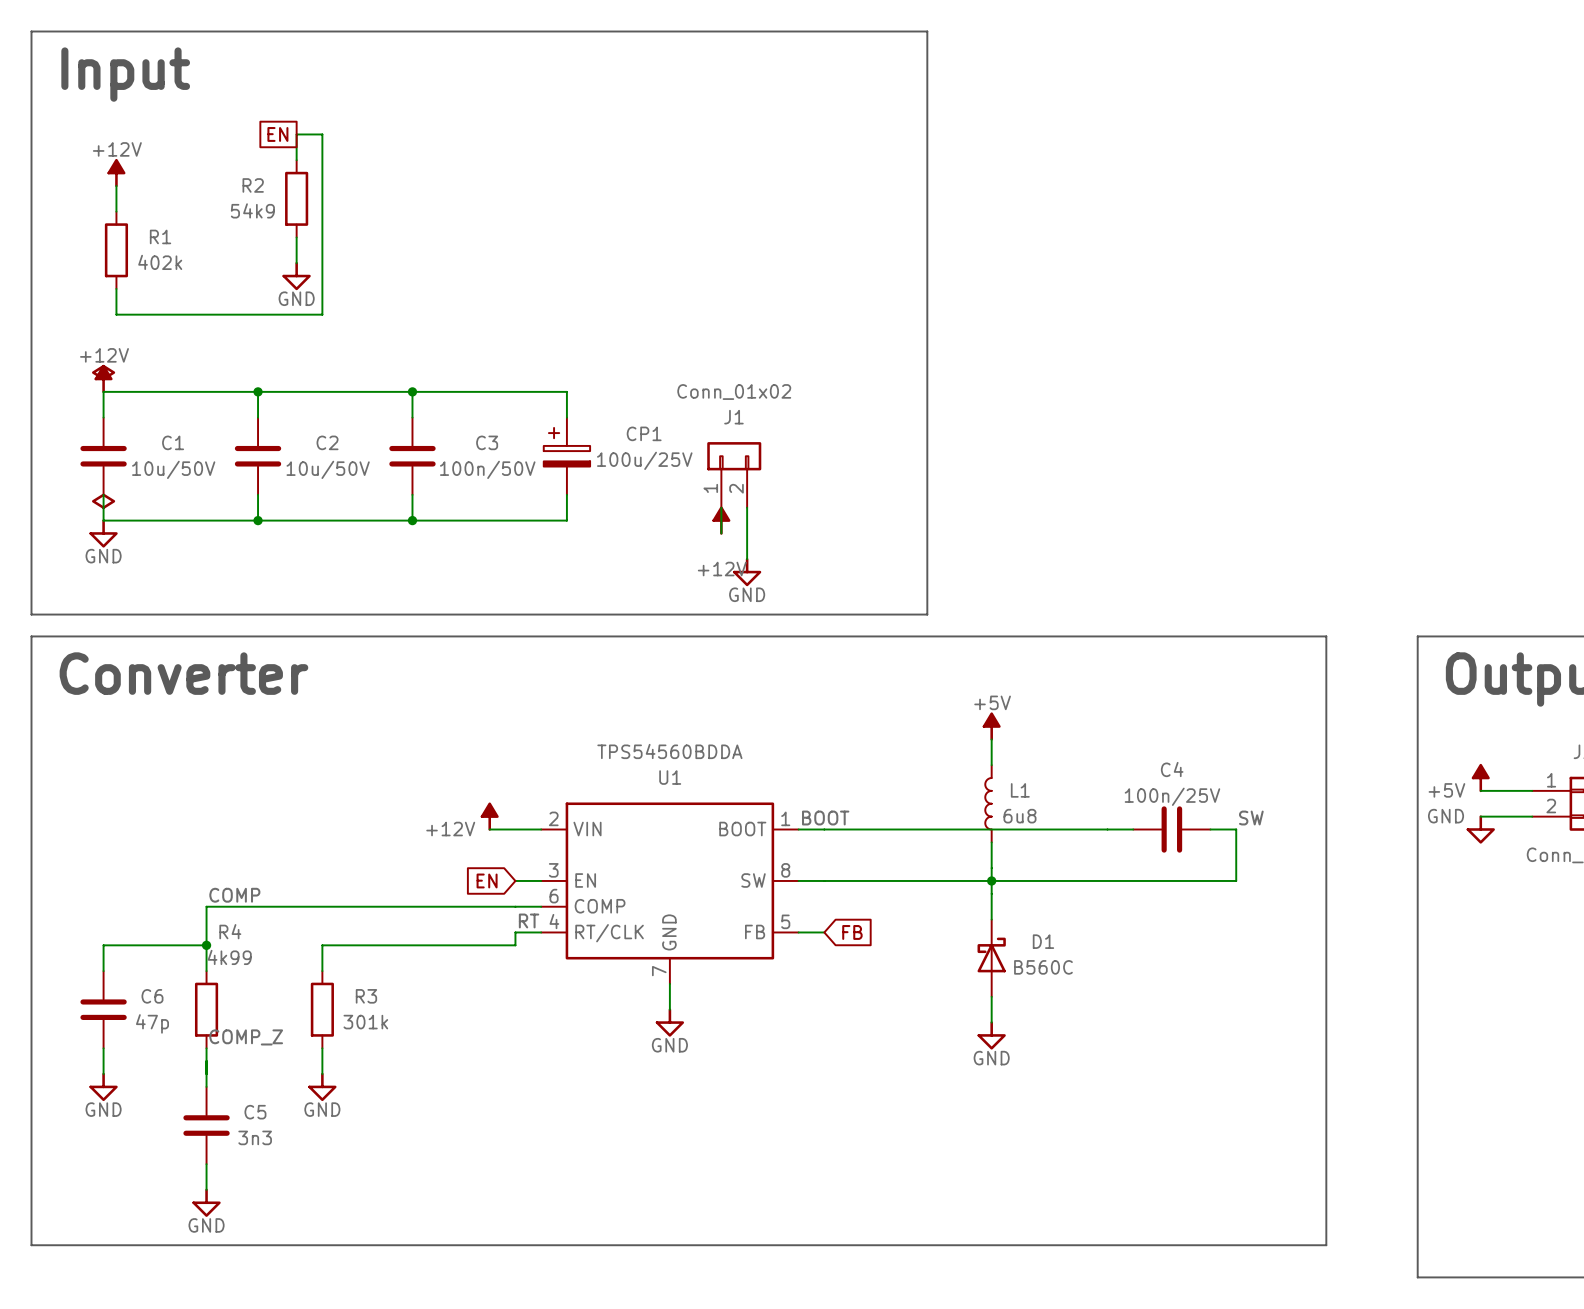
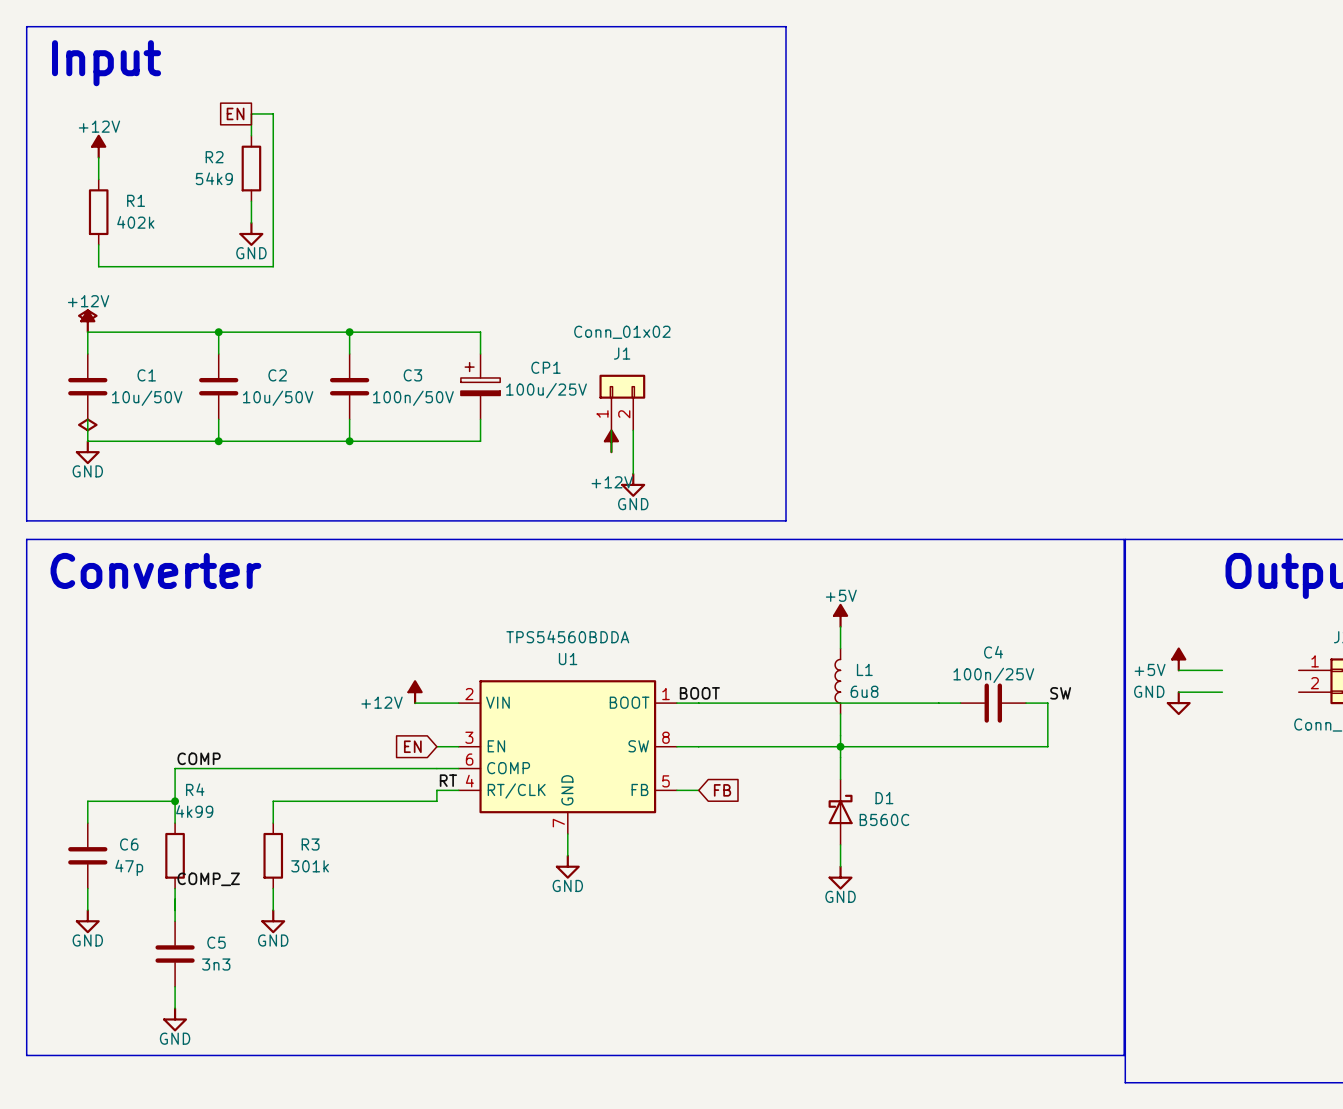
line: (1417, 636) (1417, 1277) -> (1201, 539) (1125, 539) (1125, 1082) (1201, 1082)
power symbol position: +5V (1480, 778) -> +5V (1178, 659)
wire: (1480, 790) (1532, 790) -> (1178, 670) (1222, 670)
wire: (1480, 816) (1532, 816) -> (1178, 692) (1222, 692)
power symbol position: GND (1480, 829) -> GND (1178, 703)

